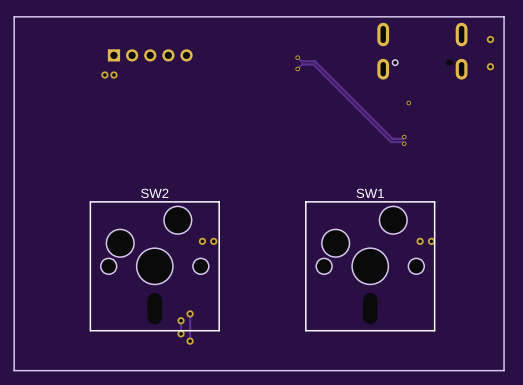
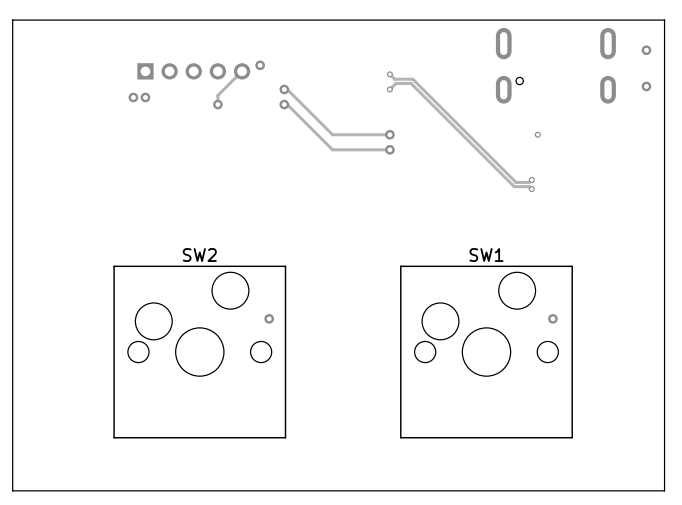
via: none -> (260, 65)
track: none -> (242, 71) (217, 95) (217, 104)
track: none -> (284, 89) (287, 89) (332, 134) (389, 134)
via: none -> (284, 89)
via: none -> (217, 104)
track: none -> (284, 104) (287, 104) (332, 149) (389, 149)
via: none -> (284, 104)
via: none -> (389, 134)
via: none -> (389, 149)
via: (202, 241) -> none
via: none -> (269, 318)
via: (213, 241) -> none
via: (431, 241) -> none
track: (190, 313) (190, 341) -> none
via: (190, 313) -> none
track: (181, 320) (181, 333) -> none
via: (181, 320) -> none
via: (181, 333) -> none
via: (190, 341) -> none

